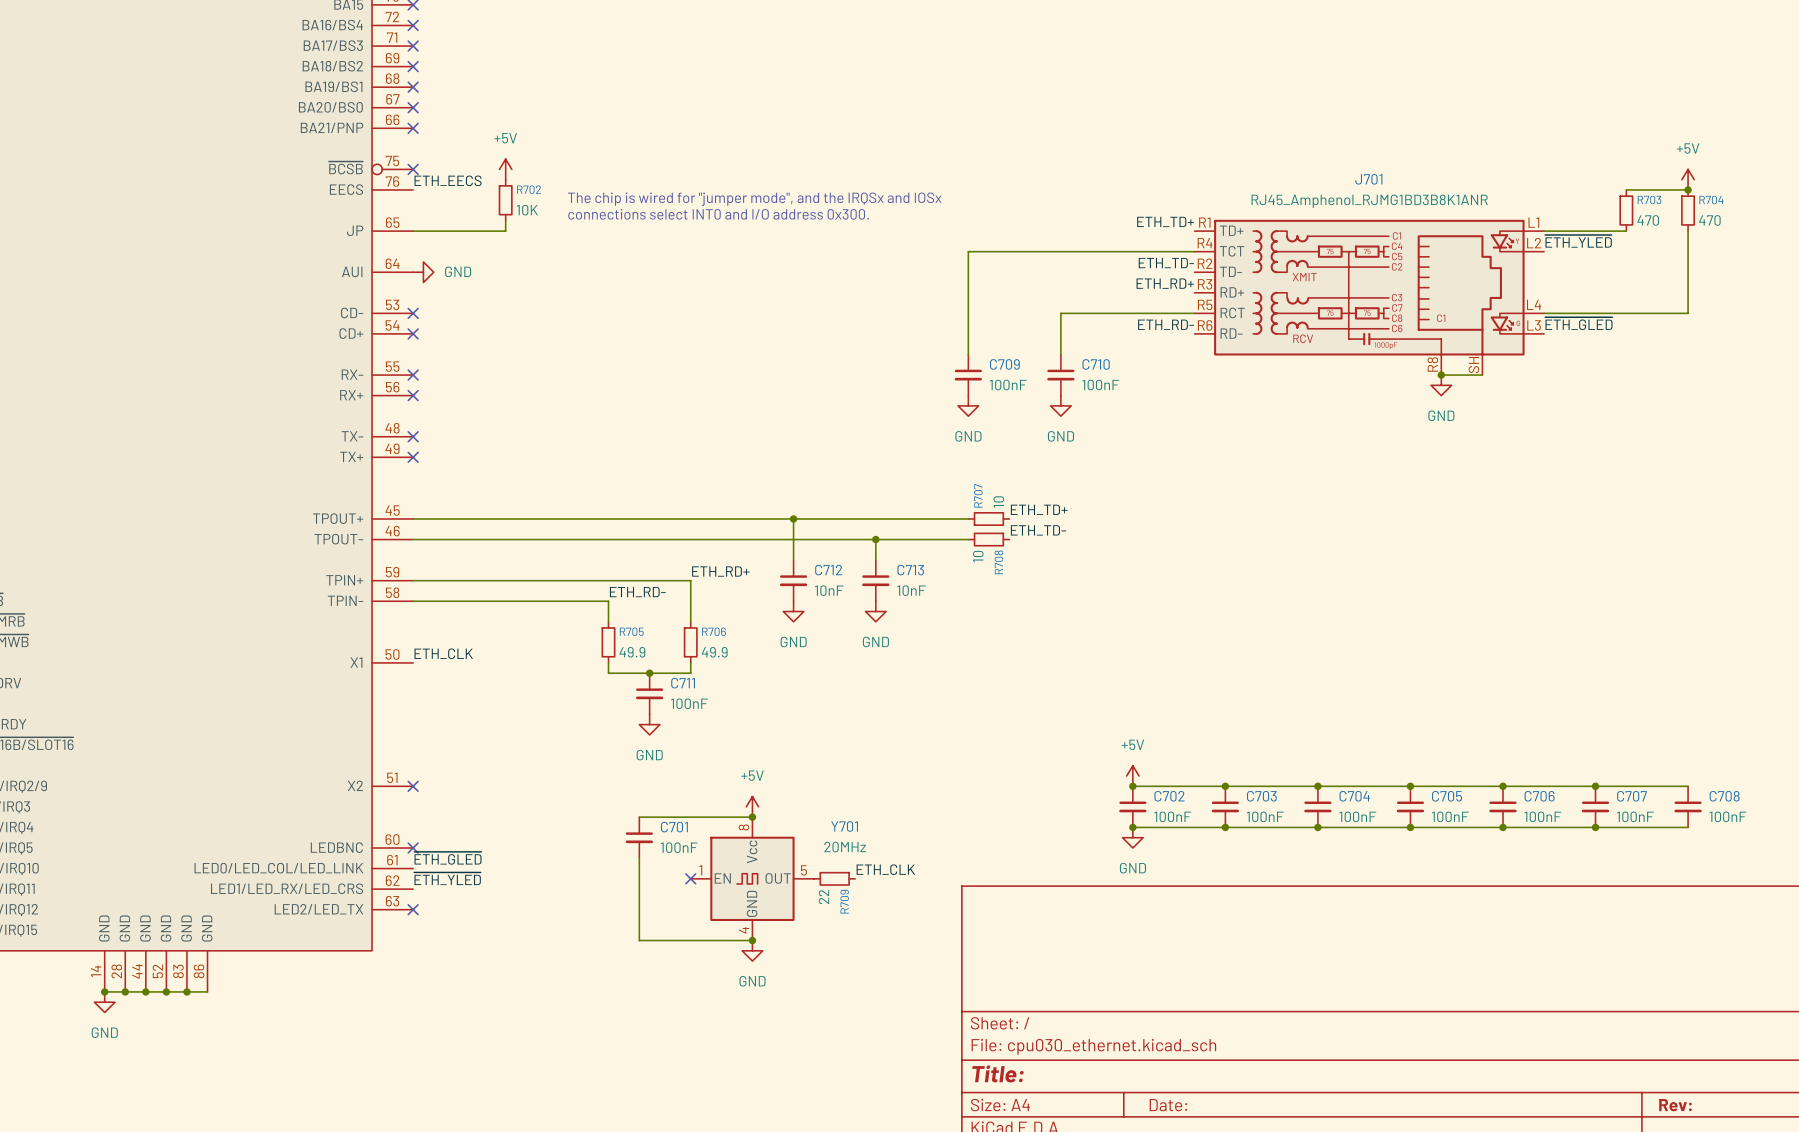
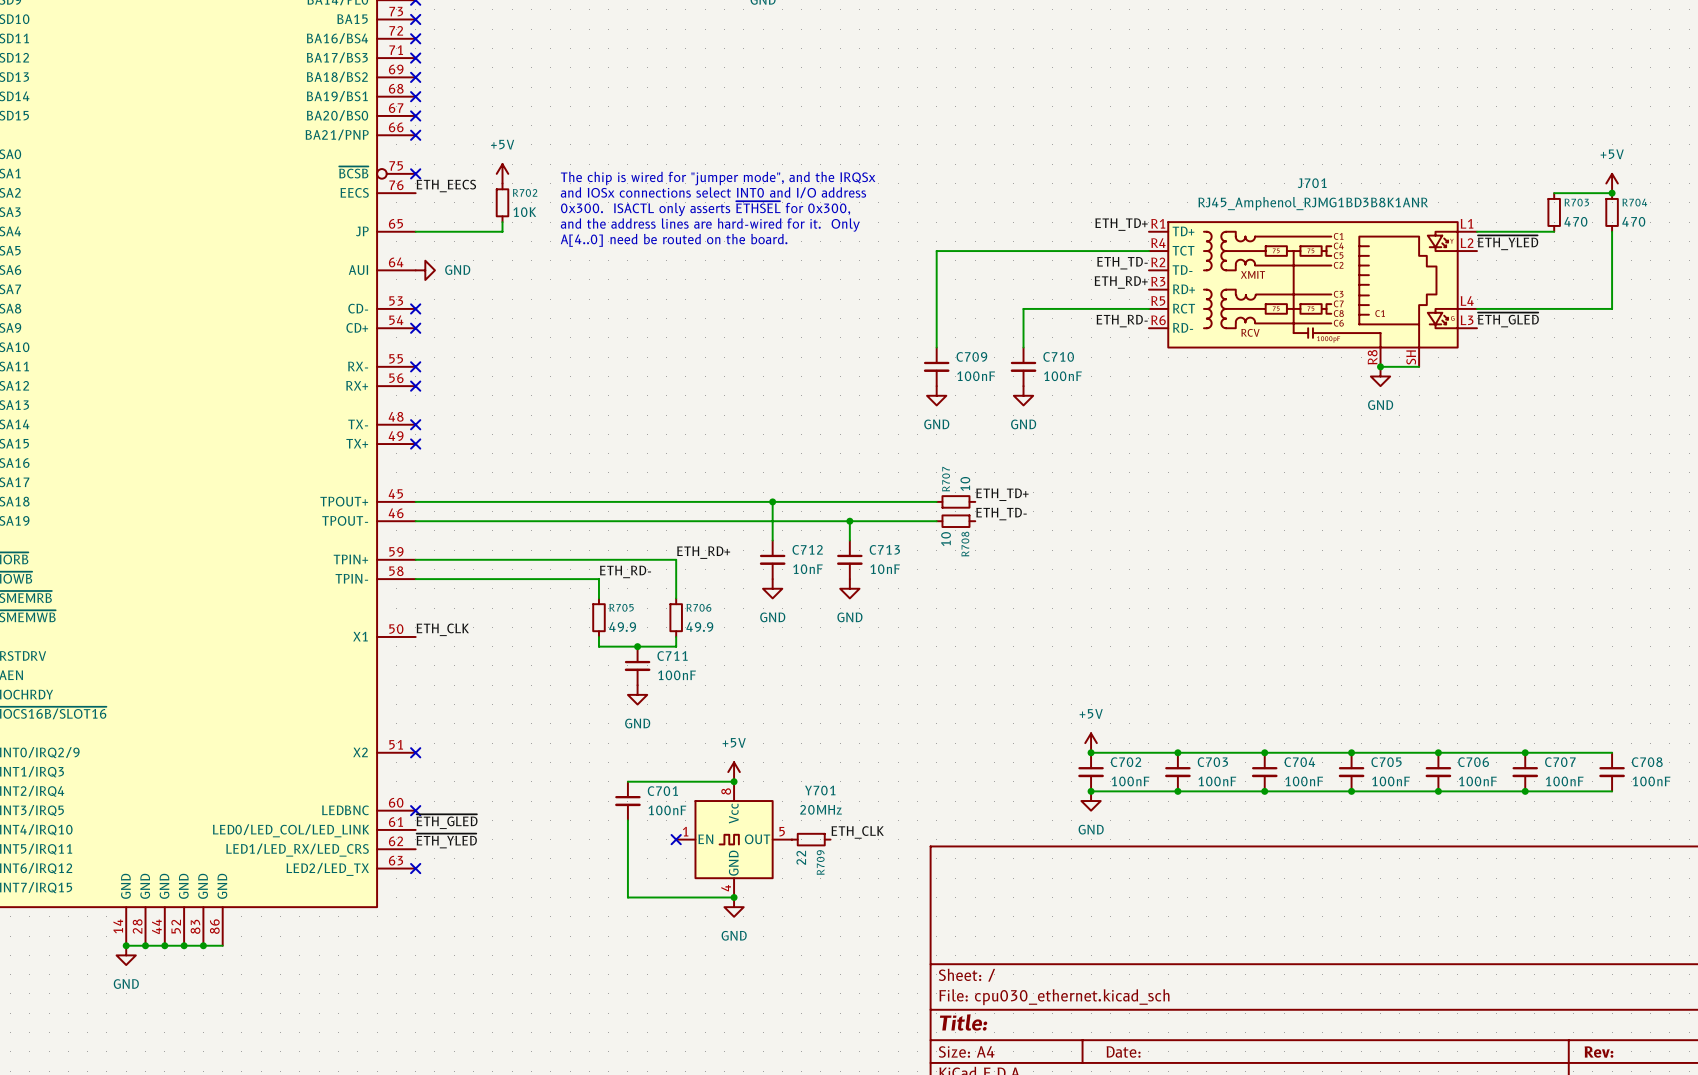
text: none -> The chip is wired for "jumper mode", and the IRQSx (718, 178)
text: none -> and IOSx connections select INT0 and I/O address (713, 192)
text: The chip is wired for "jumper mode", and the IRQSx and IOSx (754, 199) -> none
text: none -> 0x300. ISACTL only asserts ~{ETHSEL} for 0x300, (705, 208)
text: connections select INT0 and I/O address 0x300. (718, 214) -> none
text: none -> and the address lines are hard-wired for it. Only (710, 225)
text: none -> A[4..0] need be routed on the board. (674, 240)

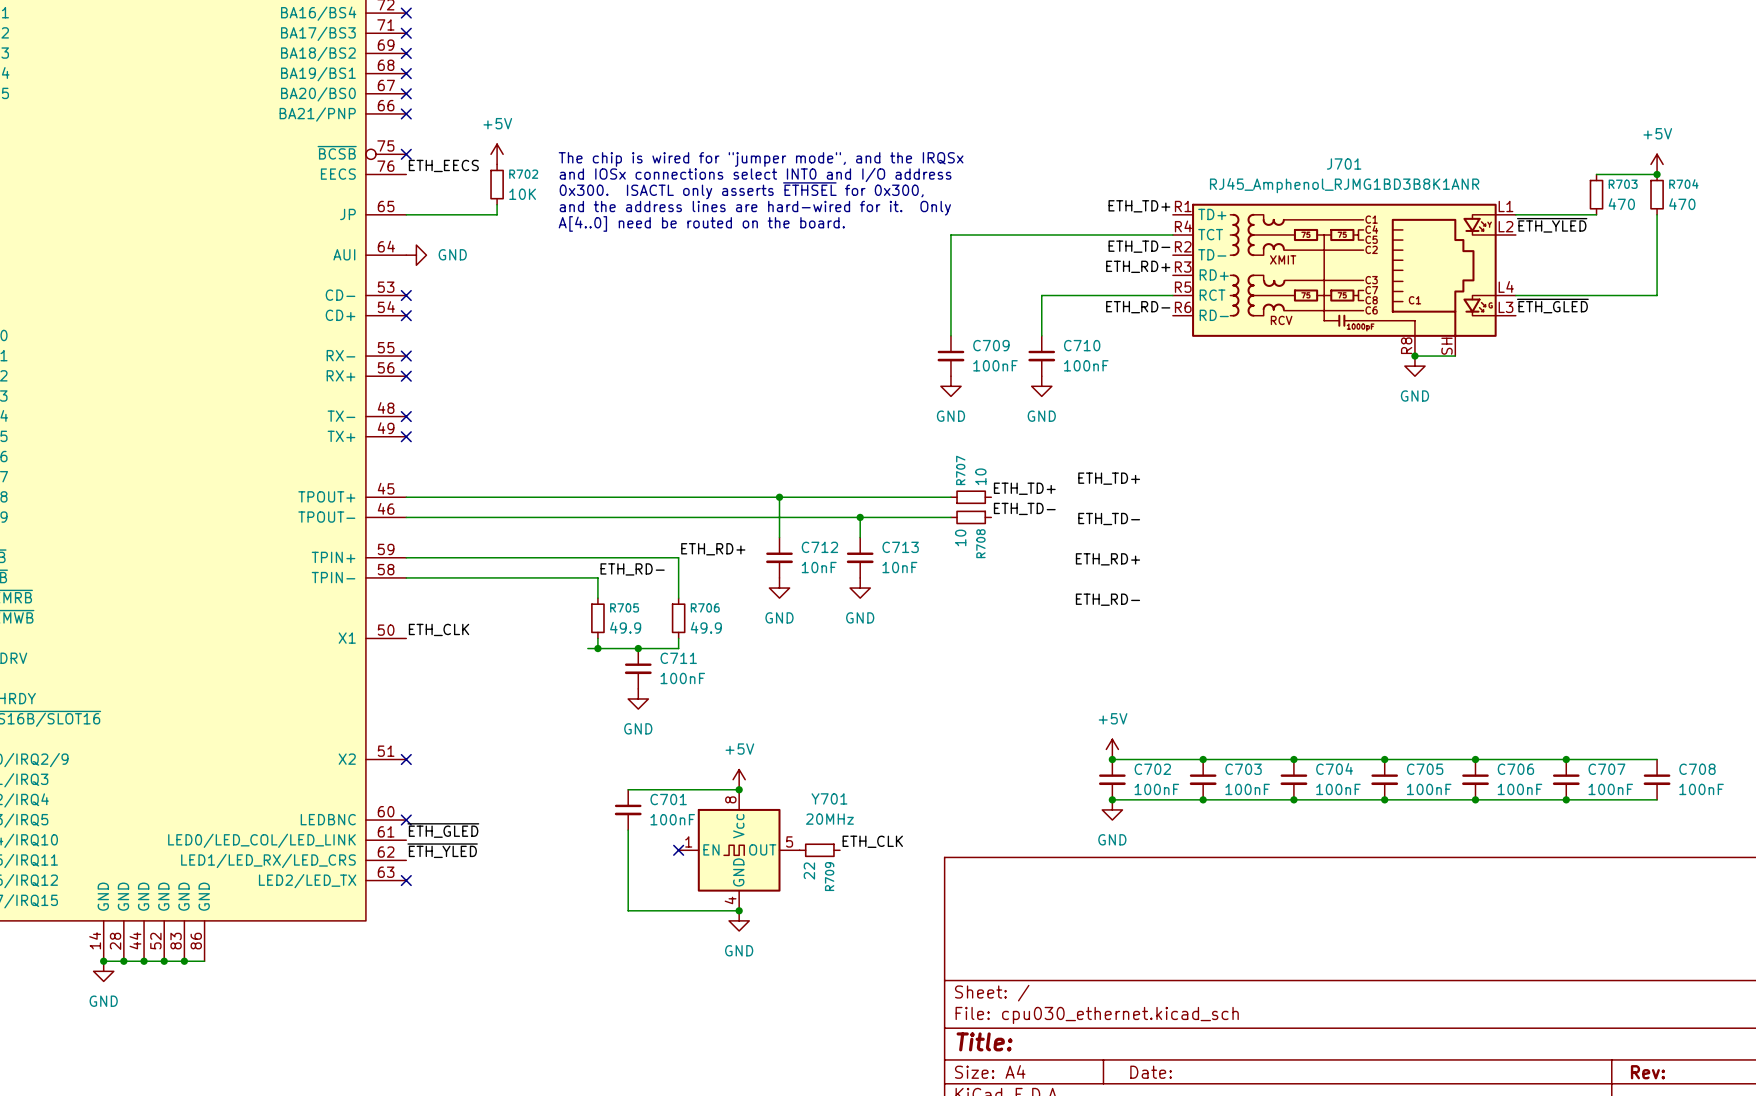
label: none -> ETH_TD+ (1109, 478)
label: none -> ETH_TD- (1109, 518)
label: none -> ETH_RD+ (1107, 559)
label: none -> ETH_RD- (1107, 599)
wire: none -> (587, 648) (597, 648)
junction: none -> (597, 648)

